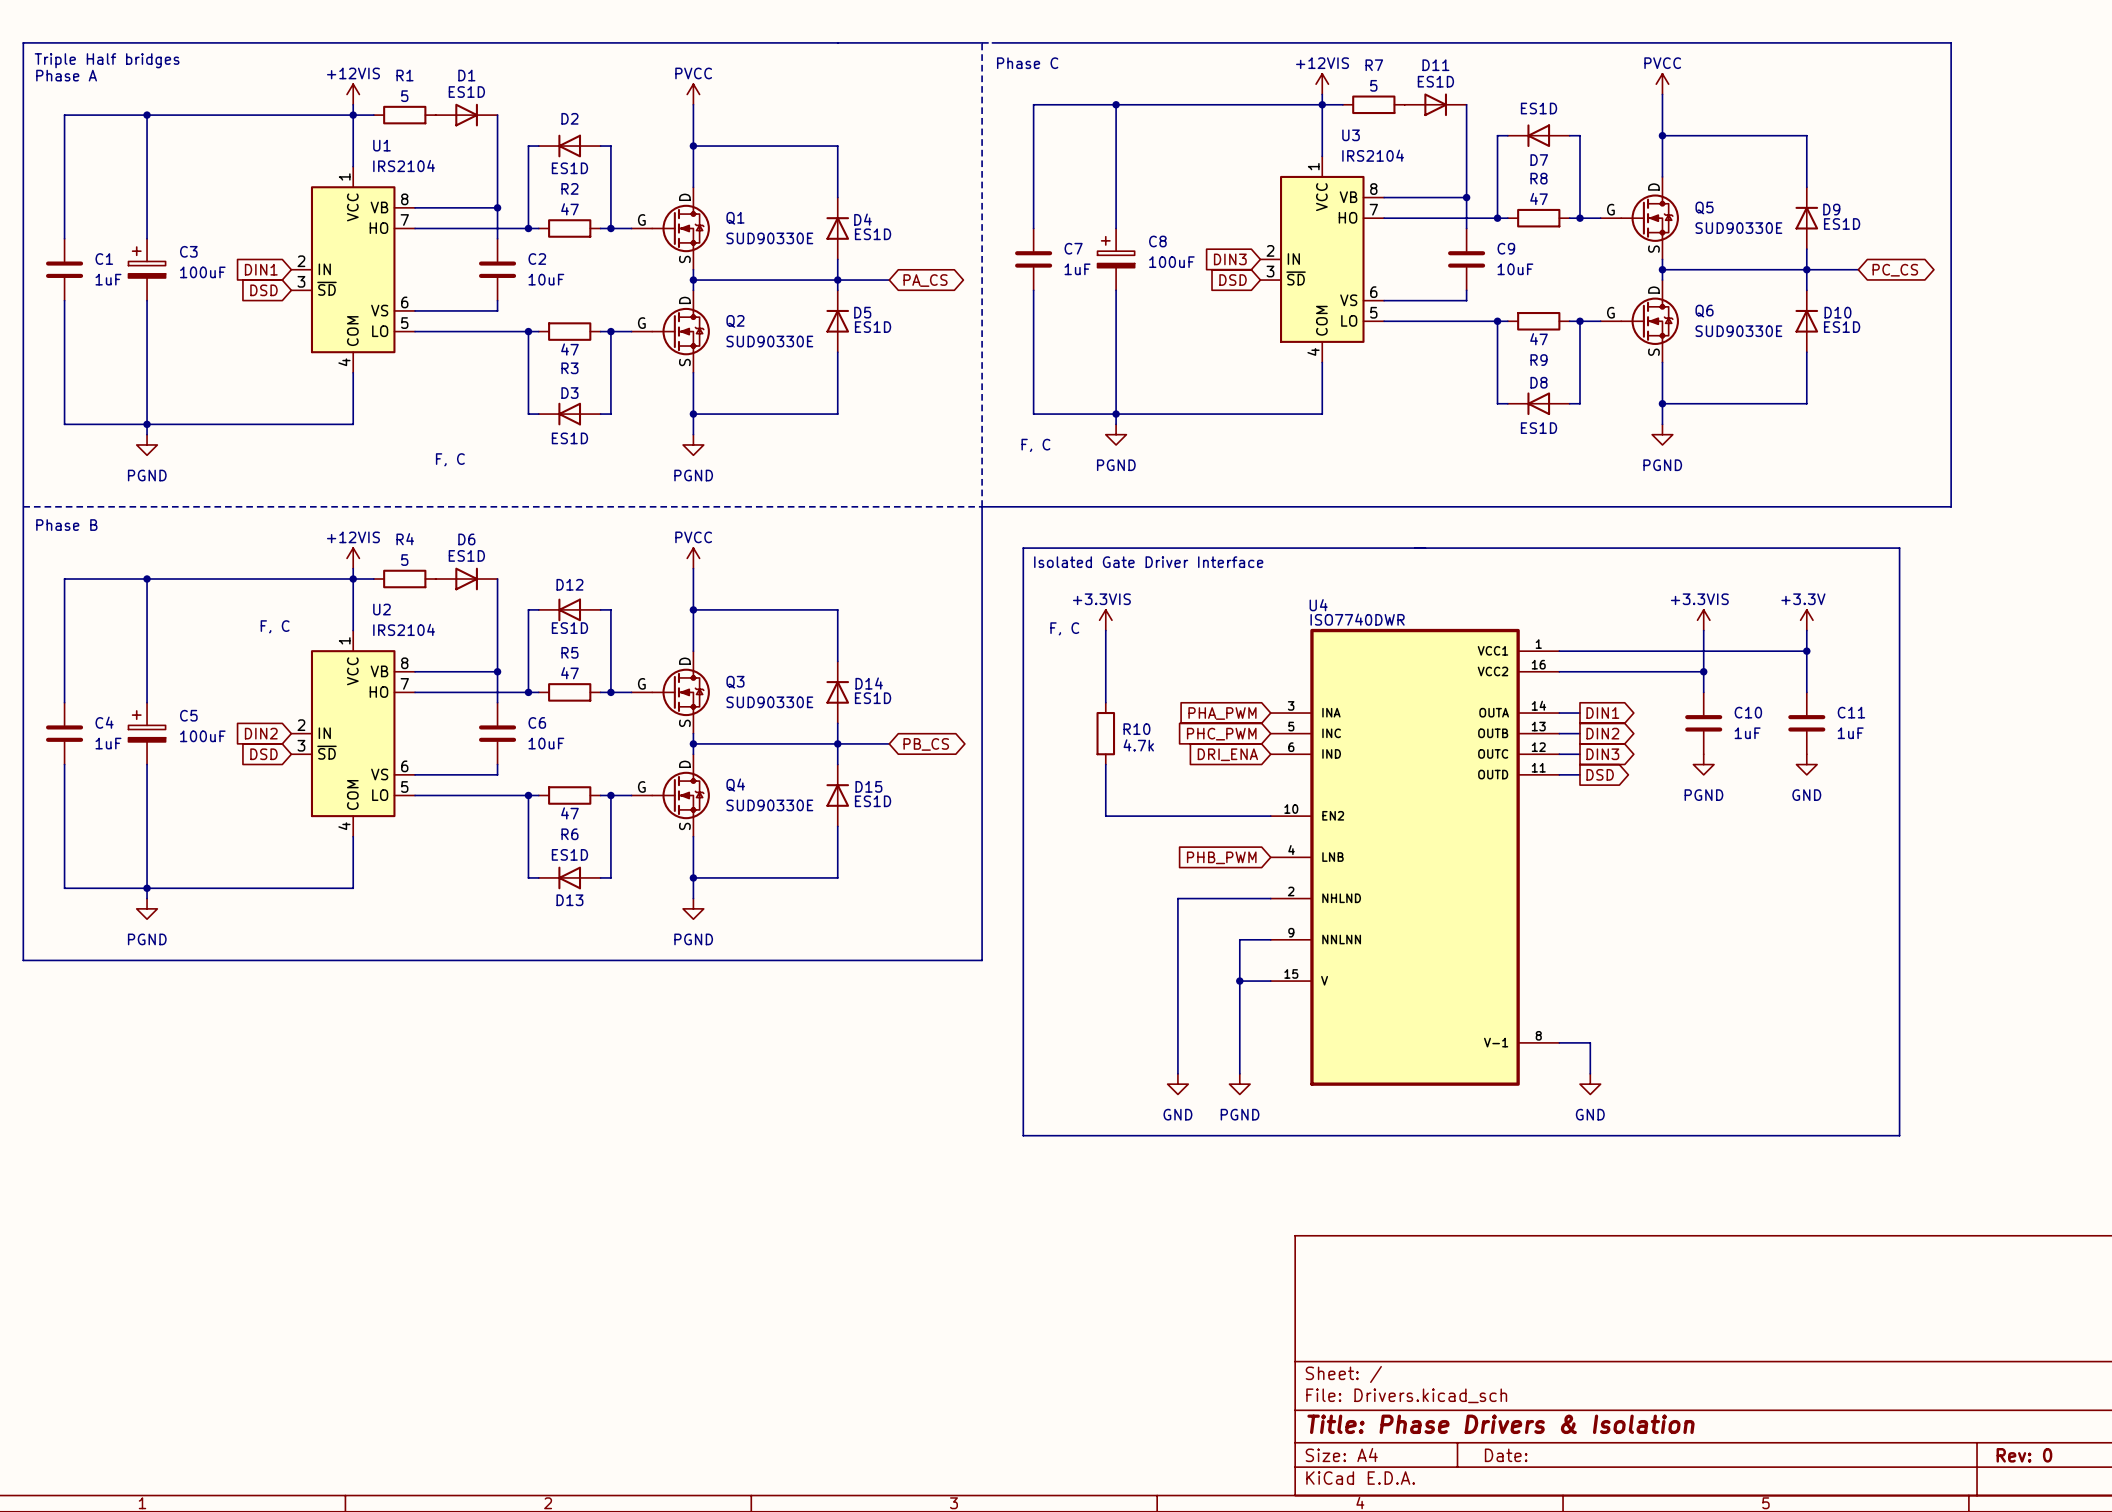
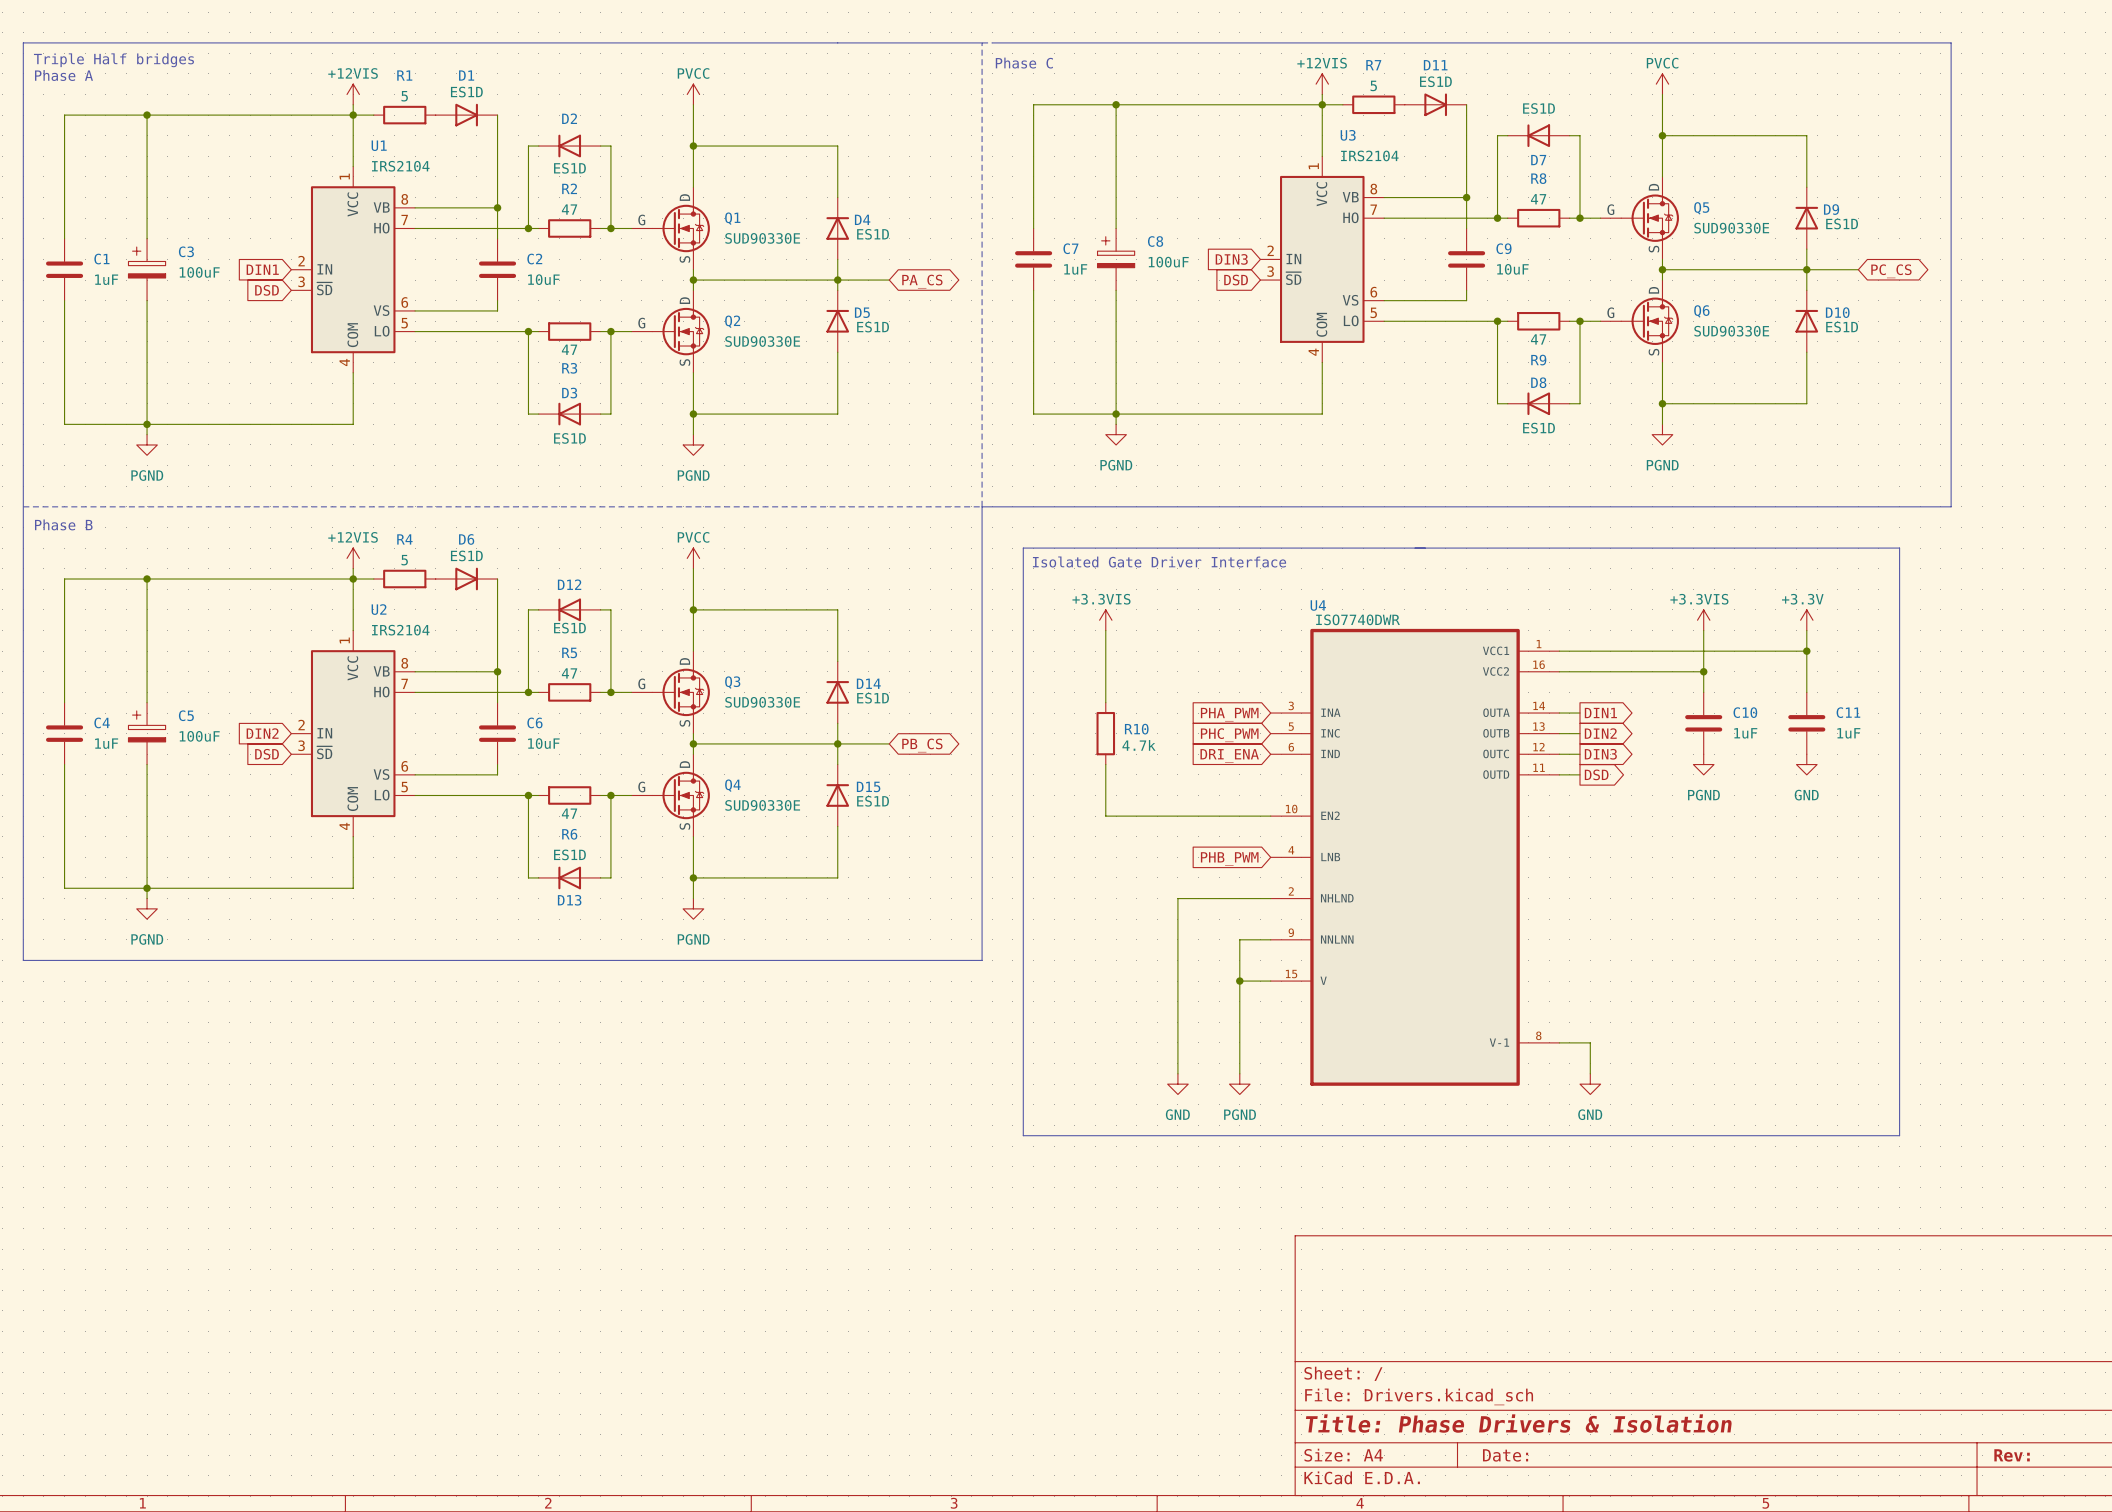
text: F, C (1035, 445) -> none
text: F, C (450, 459) -> none
text: F, C (275, 626) -> none
text: F, C (1064, 628) -> none
title block: Rev: 0 (2024, 1455) -> Rev: (2012, 1455)

